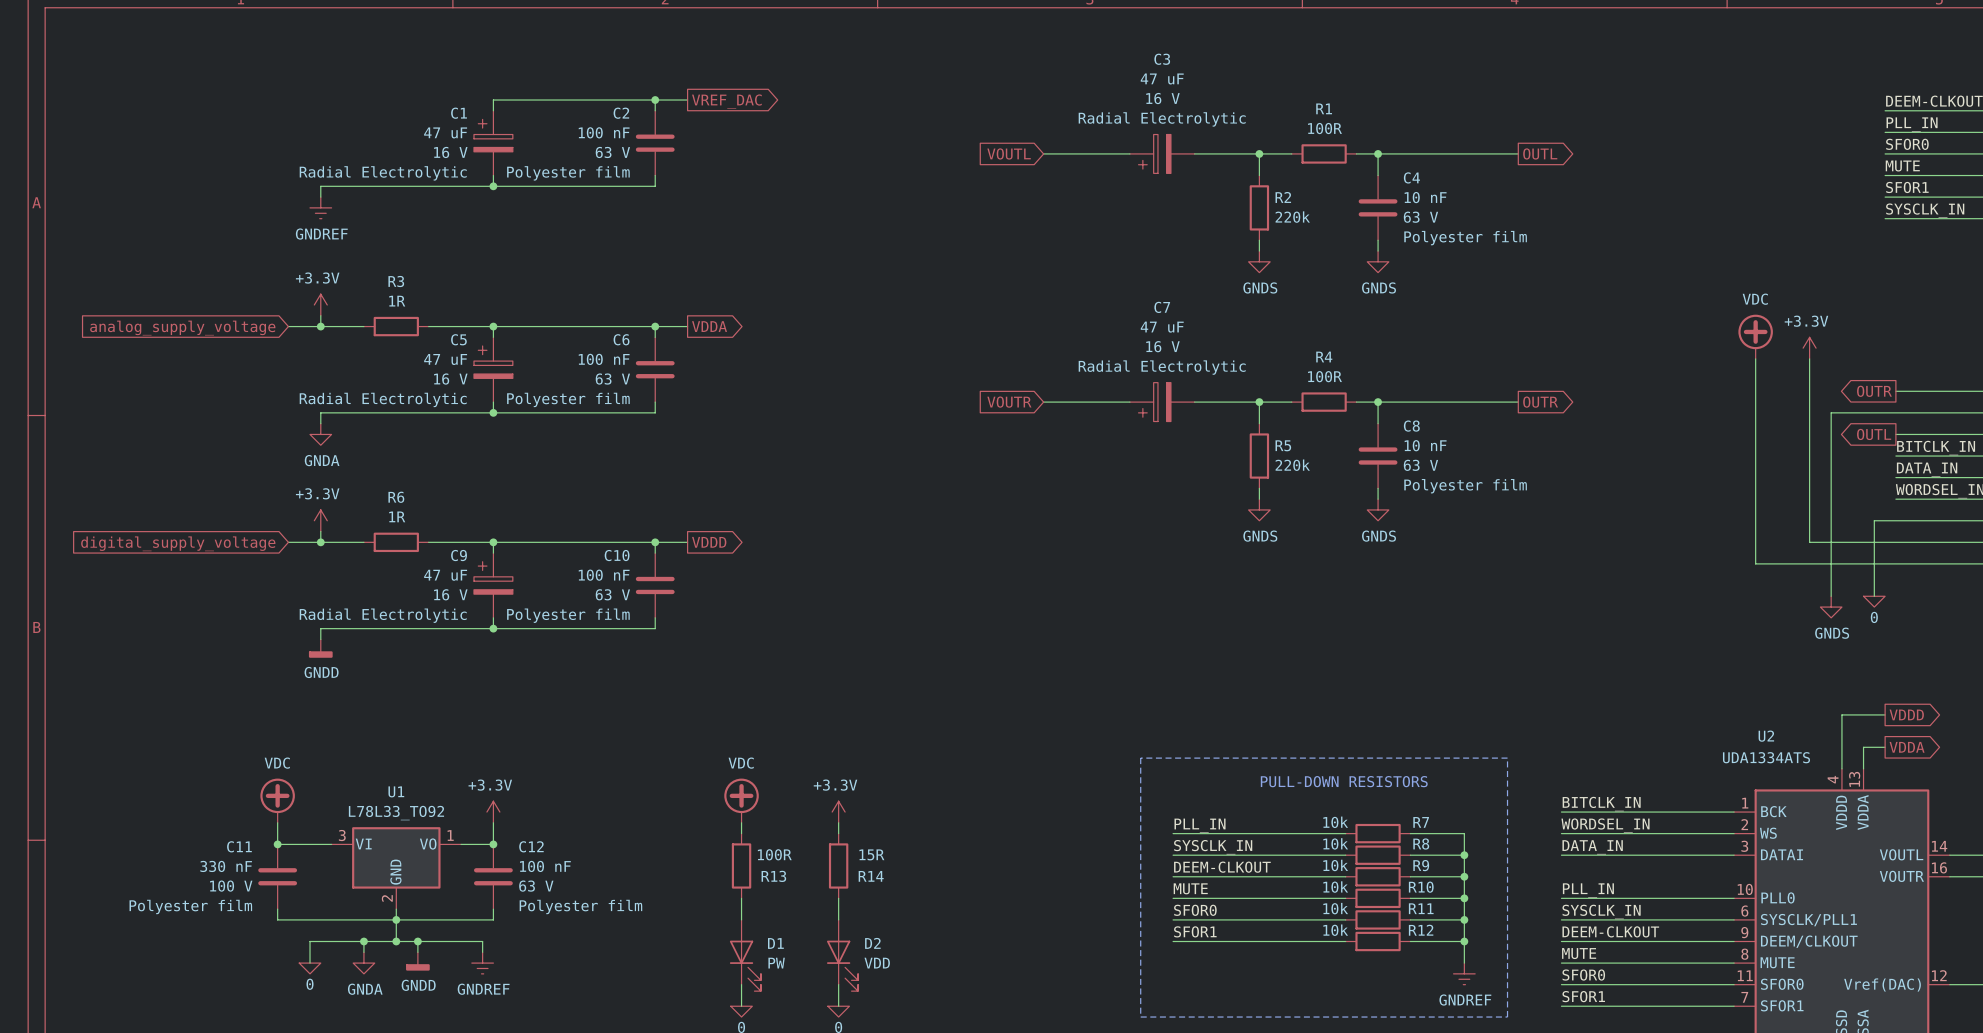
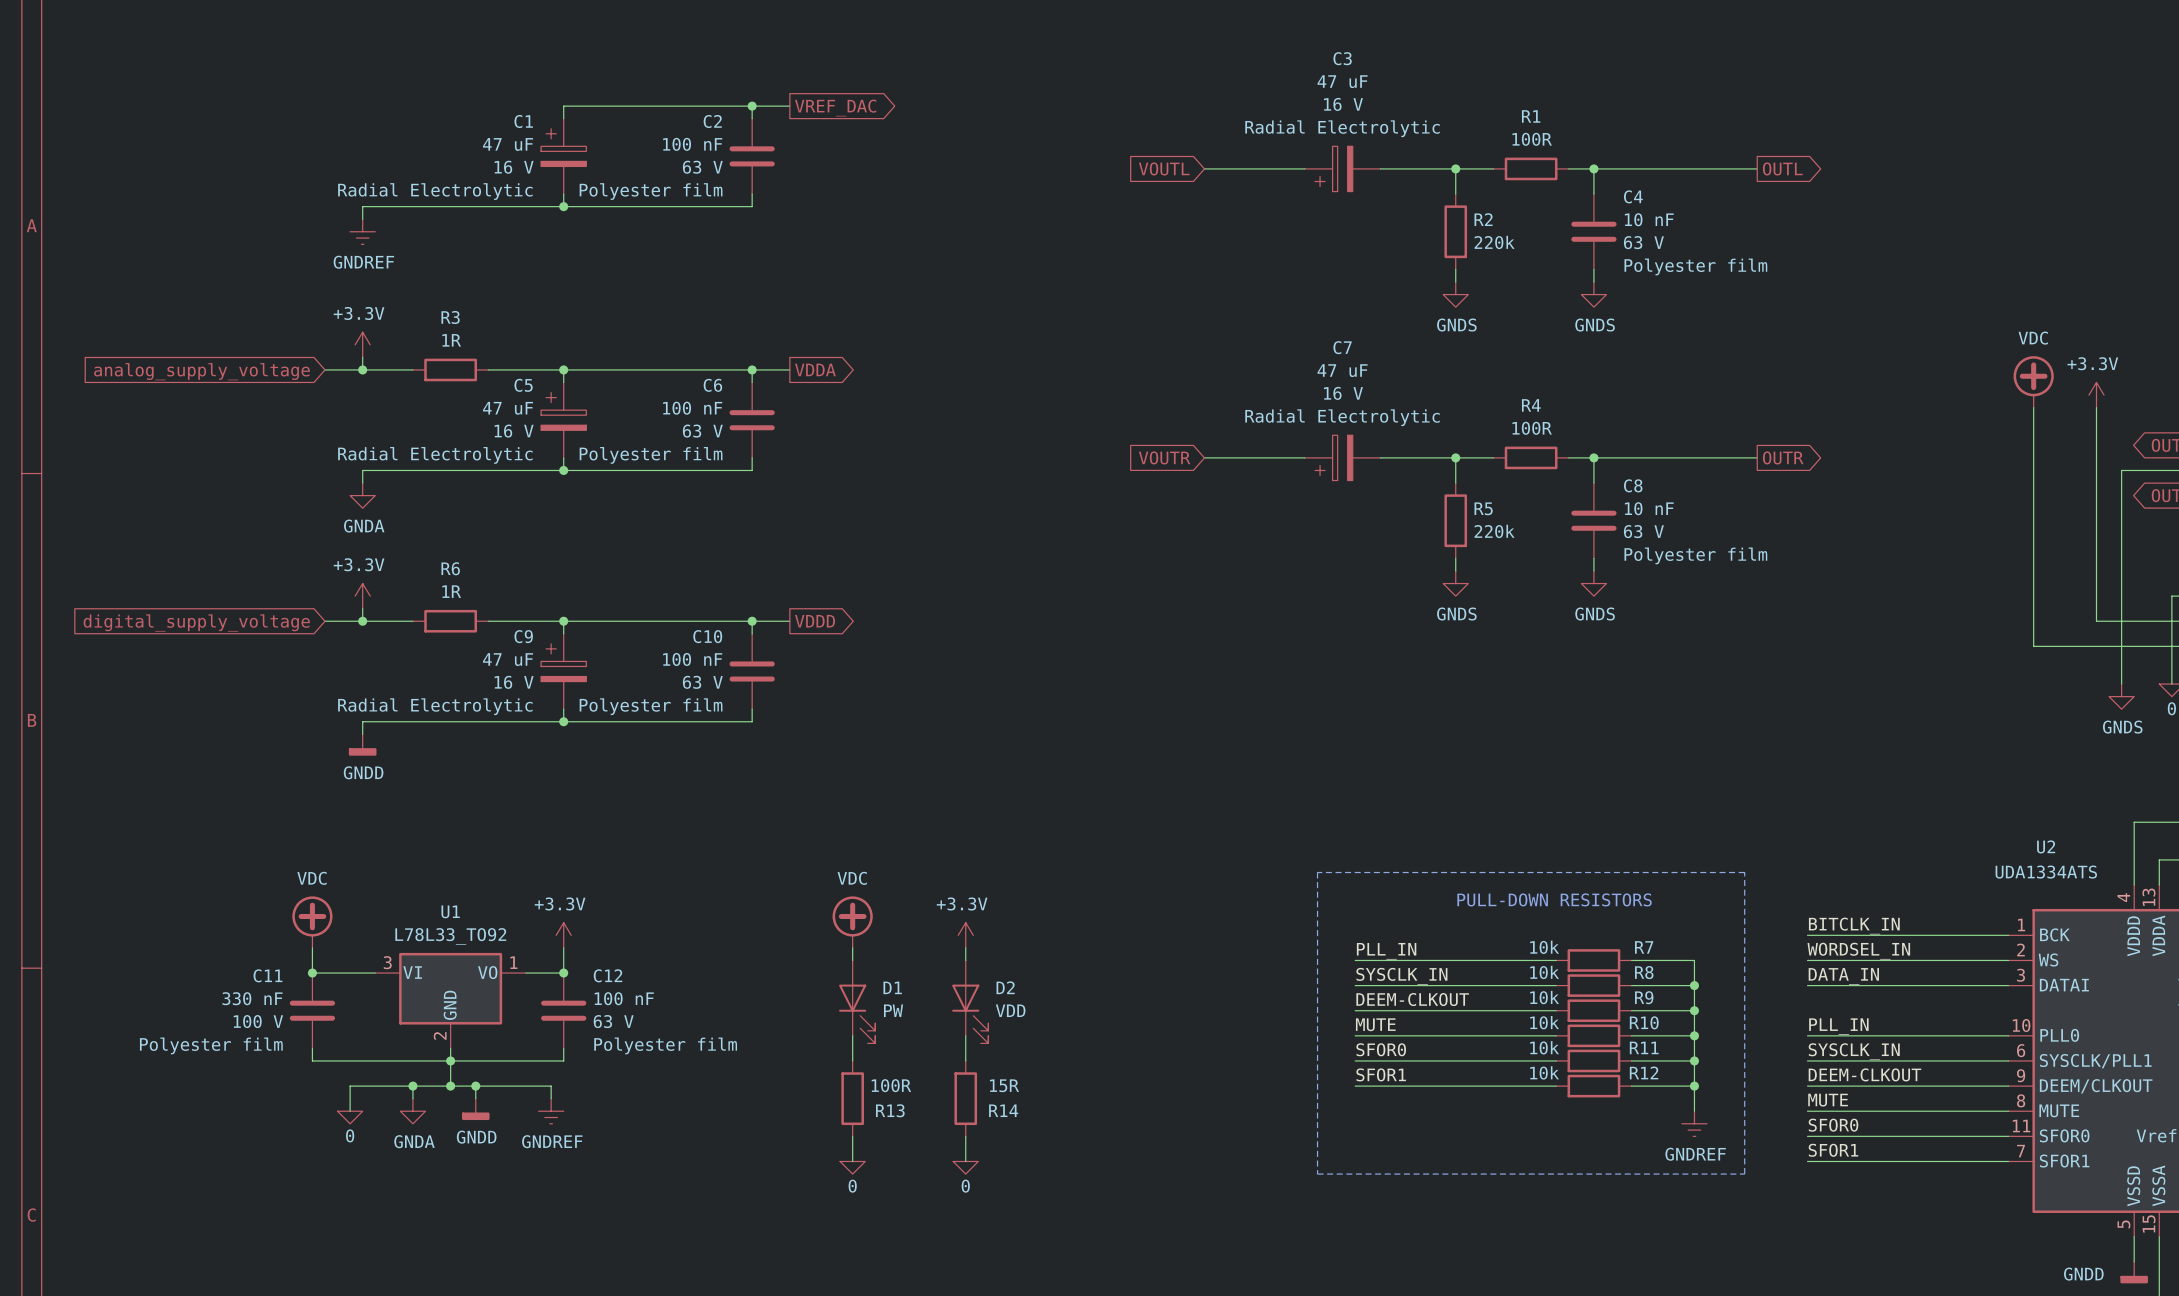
R13 position: (741, 865) -> (852, 1098)
R14 position: (838, 865) -> (965, 1098)
D1 position: (745, 955) -> (857, 1001)
D2 position: (842, 955) -> (970, 1001)

